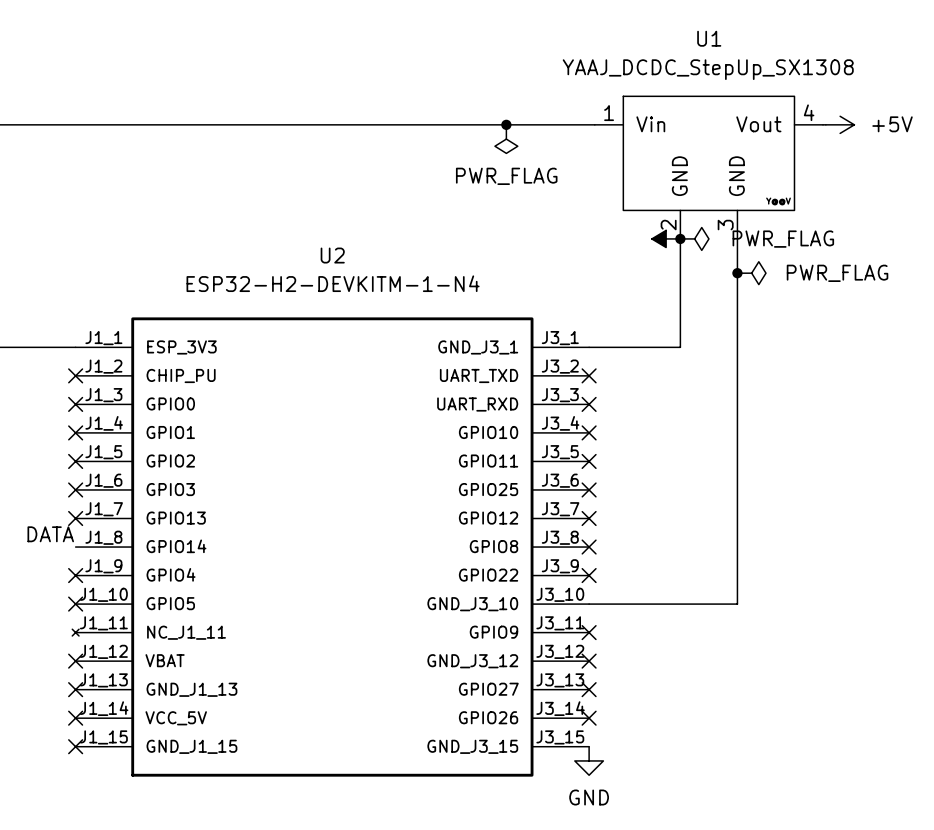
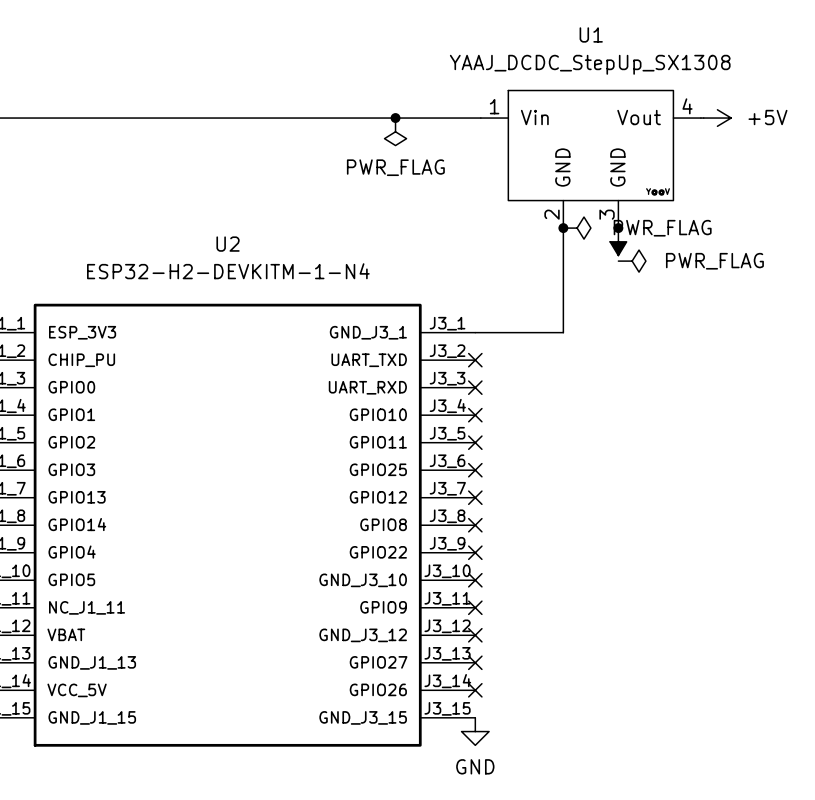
power symbol rotation: 0° (666, 238) -> 90° counterclockwise (618, 241)
power symbol position: (666, 238) -> (618, 241)
wire: (737, 238) (737, 604) (589, 604) -> none
junction position: (737, 273) -> (618, 228)
no-connect mark: none -> (475, 580)

